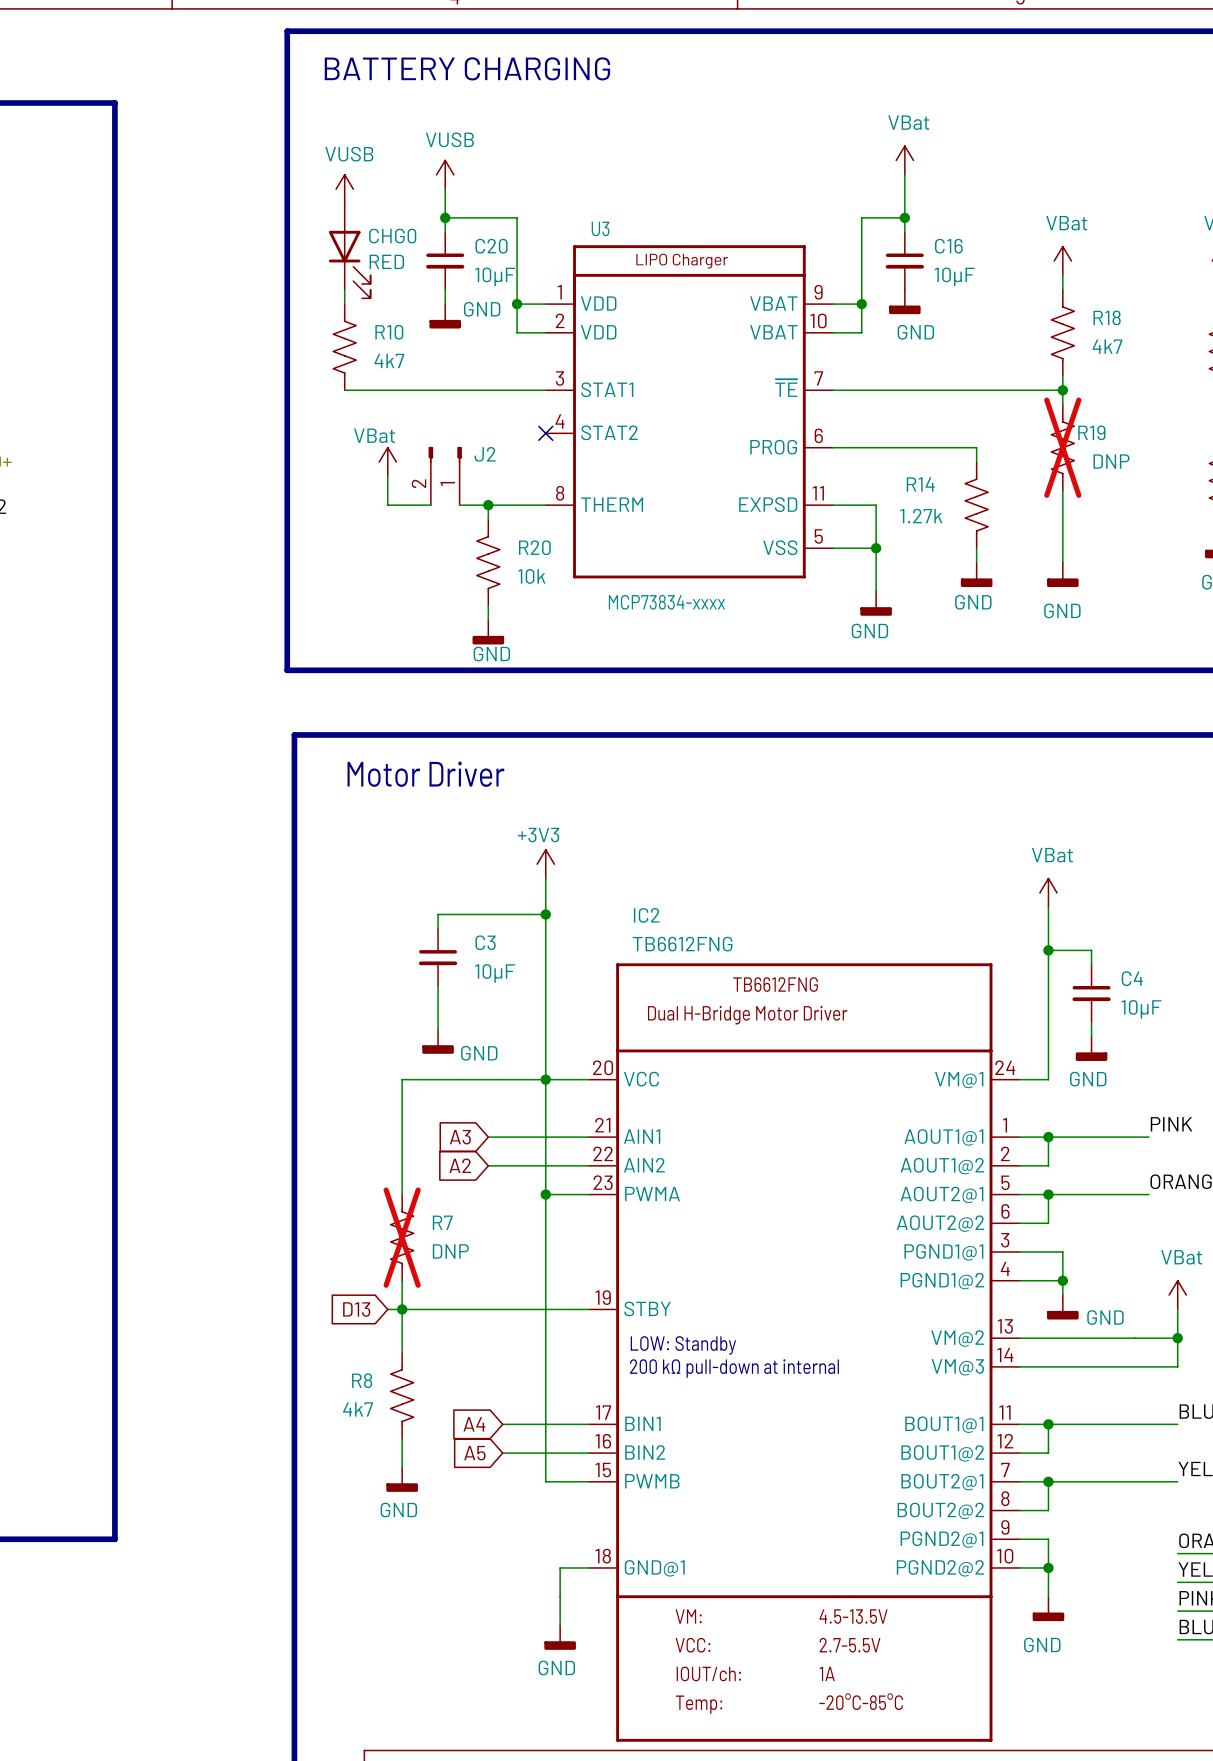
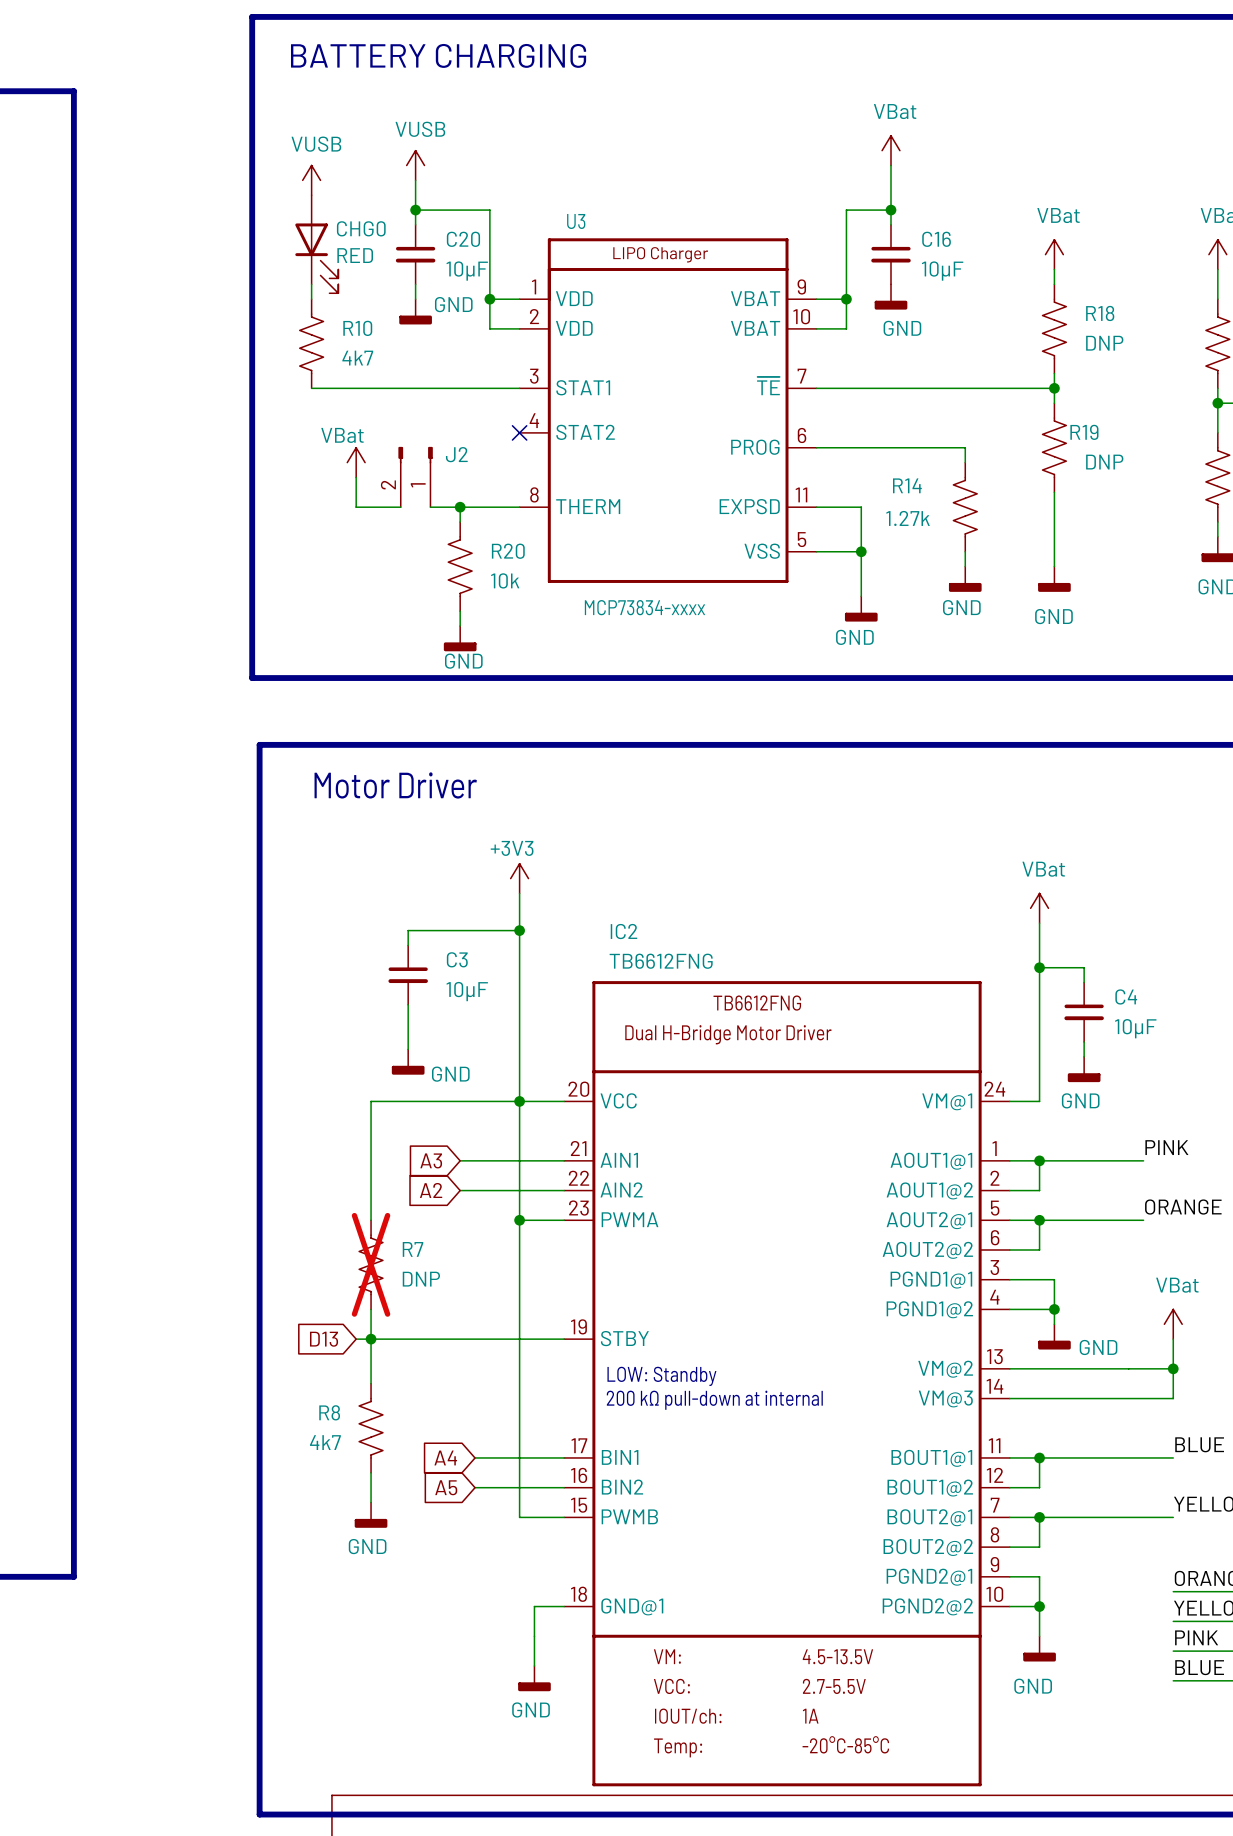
R18 value: 4k7 (1107, 346) -> DNP (1104, 343)
R19 do-not-place cross: (1062, 447) -> none

